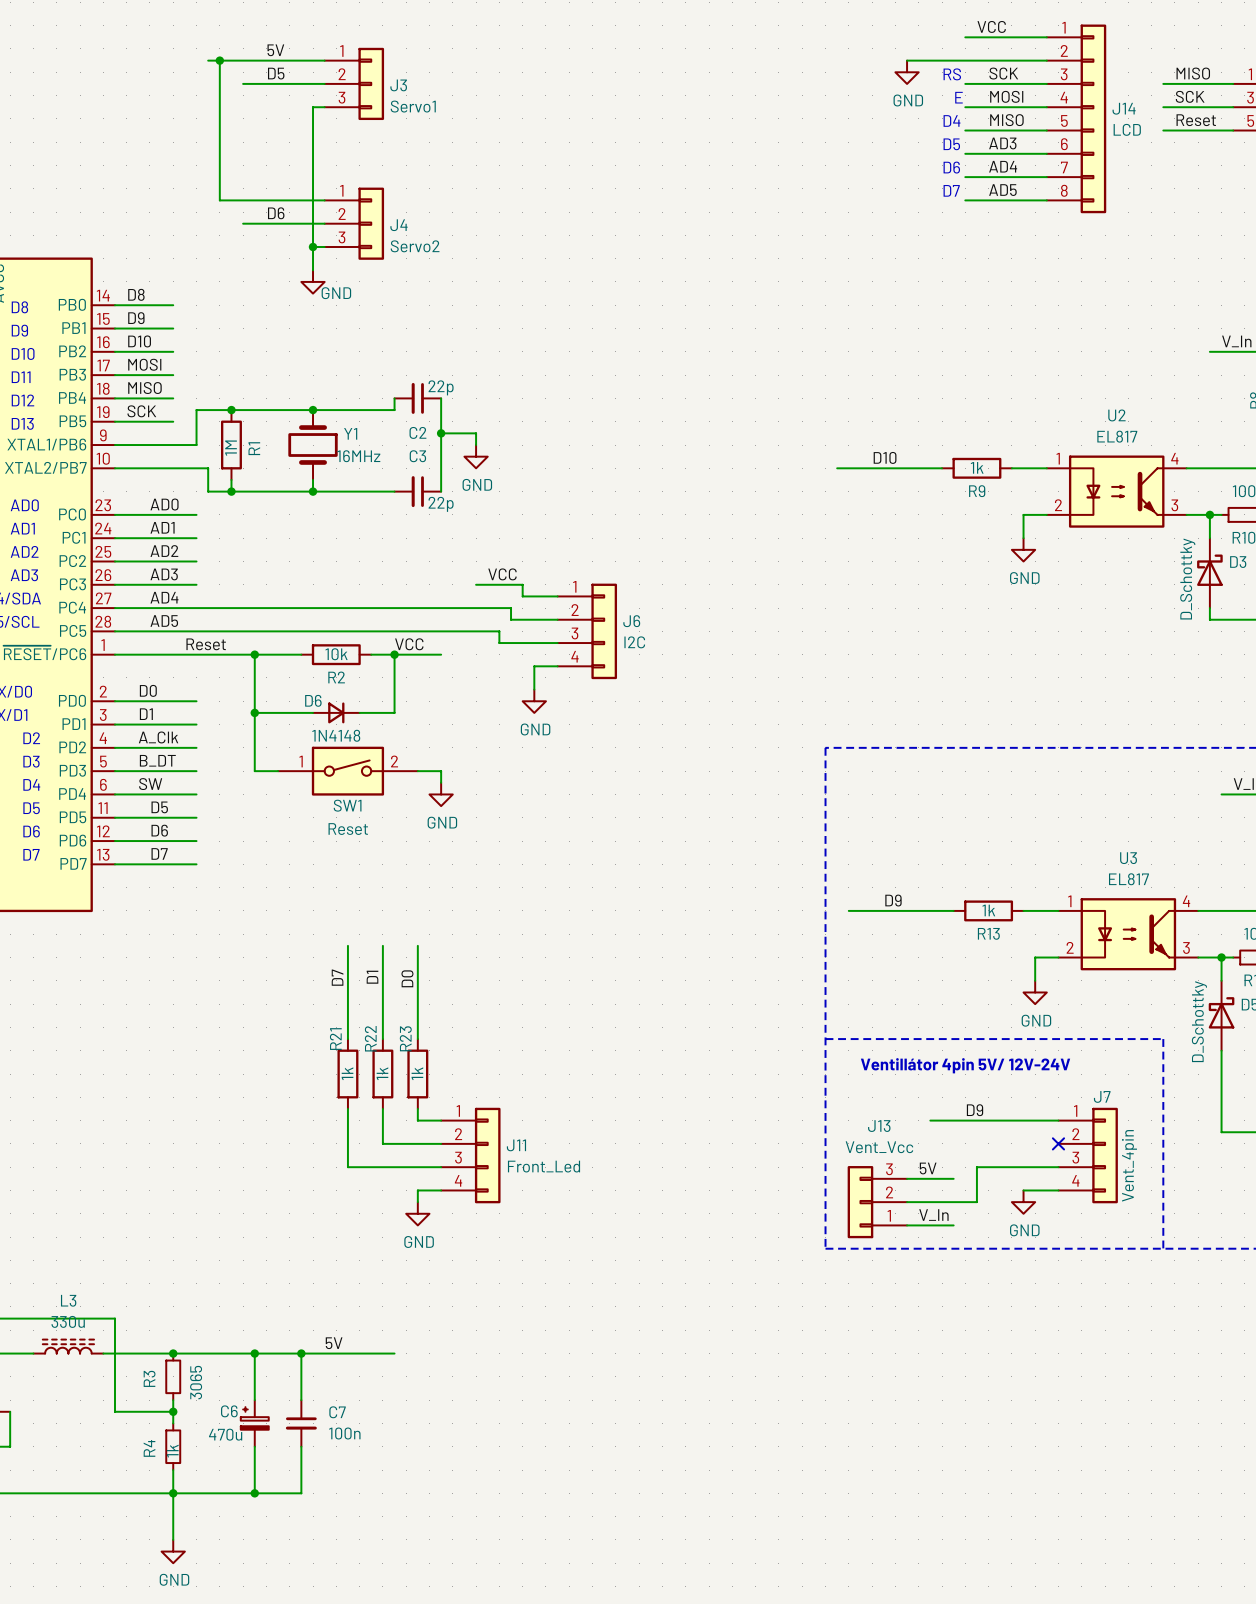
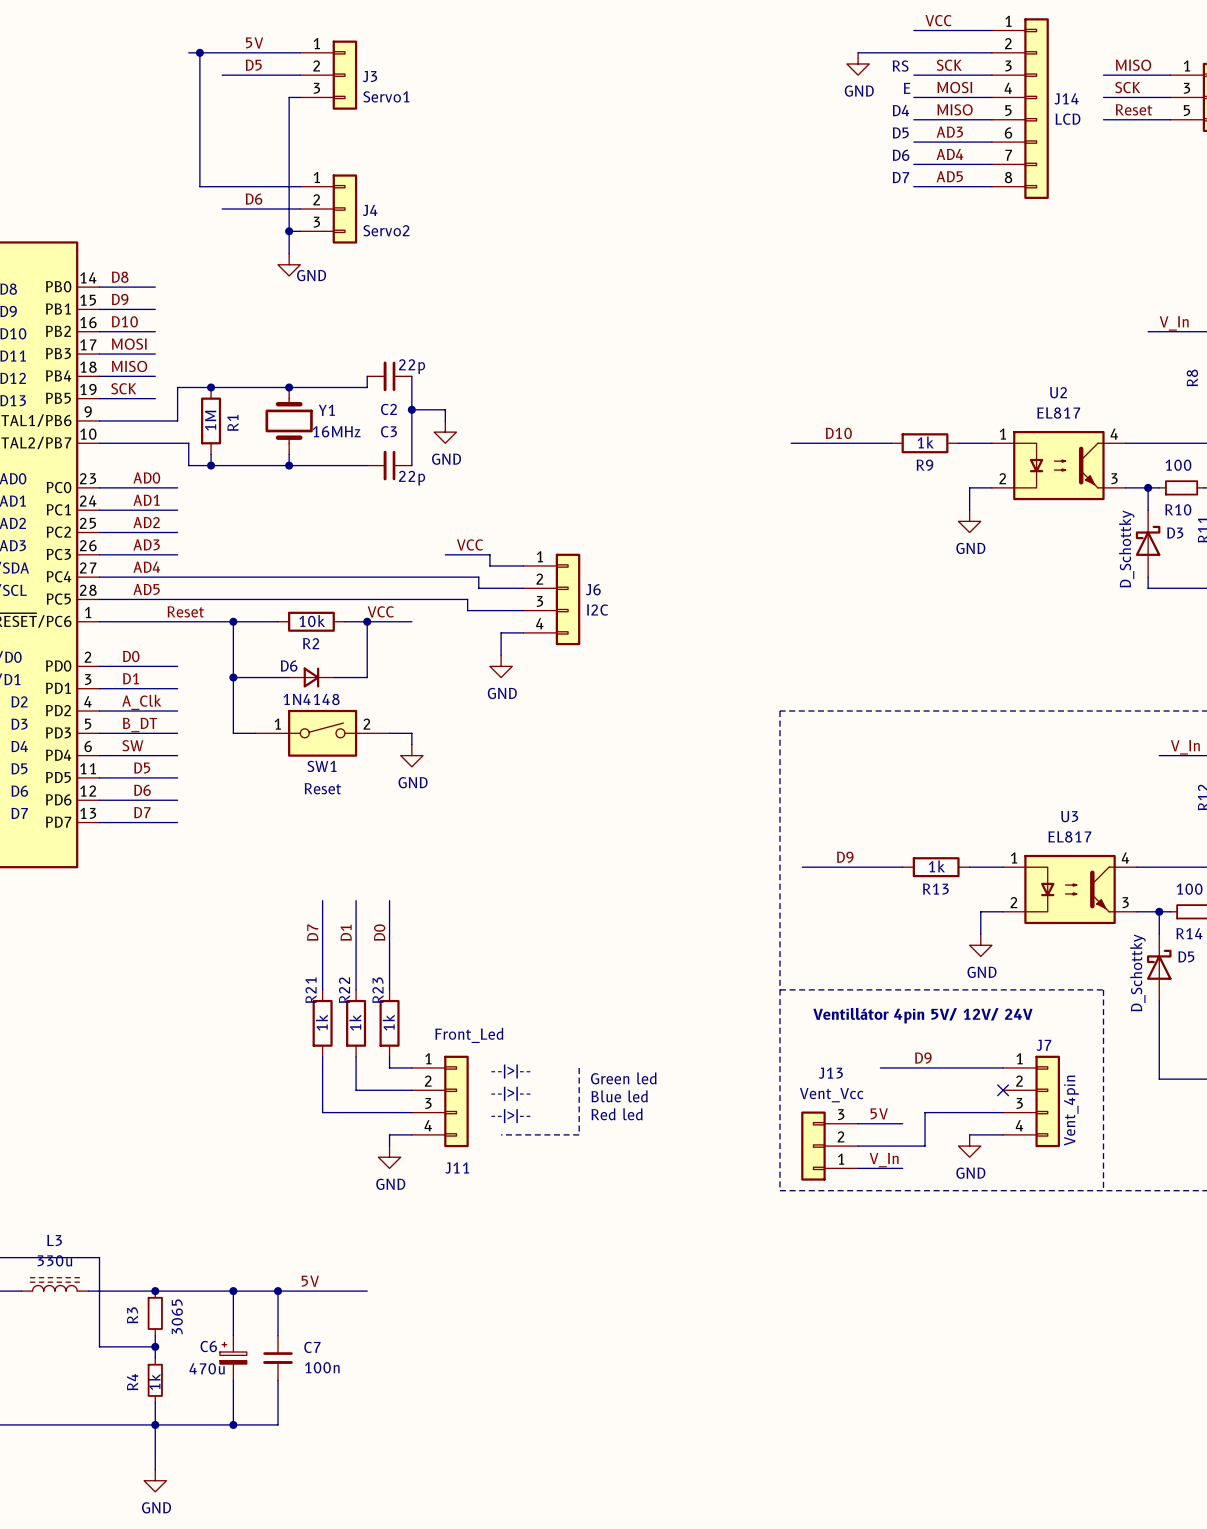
text: Ventillátor 4pin 5V/ 12V-24V (965, 1065) -> Ventillátor 4pin 5V/ 12V/ 24V (922, 1015)
line: none -> (579, 1067) (579, 1134) (501, 1134)
text: none -> --|>|-- (510, 1071)
text: none -> Green led (623, 1078)
J11 name position: J11 (516, 1145) -> J11 (457, 1168)
text: none -> --|>|-- (510, 1093)
text: none -> Blue led (619, 1096)
J11 value position: Front_Led (544, 1166) -> Front_Led (469, 1035)
text: none -> --|>|-- (510, 1116)
text: none -> Red led (617, 1114)

